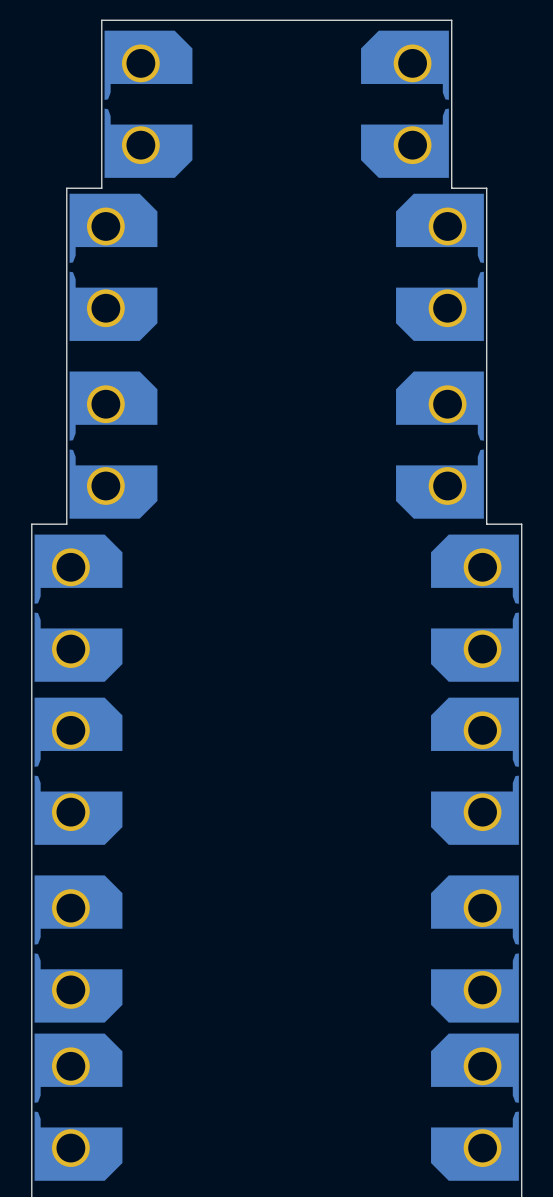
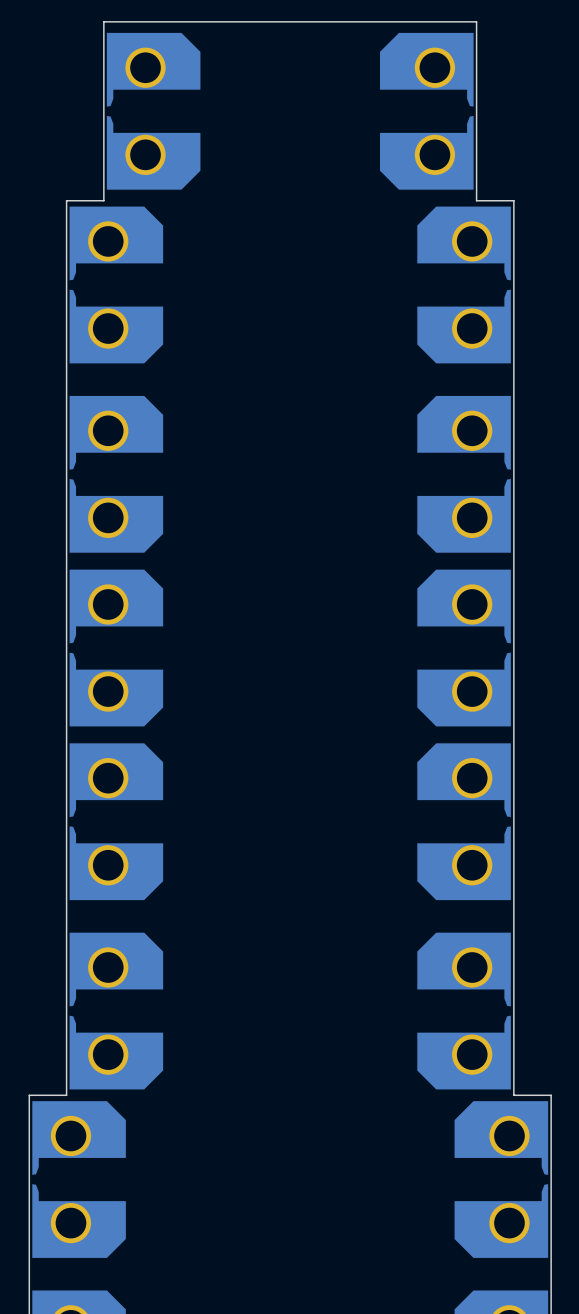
board edge: (66, 524) (31, 524) (31, 1028) -> (66, 558) (66, 1095) (29, 1095)
board edge: (486, 524) (521, 524) (521, 1028) -> (513, 558) (513, 1095) (551, 1095)
part position: (78, 608) -> (116, 648)
part position: (474, 608) -> (464, 648)
part position: (78, 771) -> (116, 821)
part position: (474, 771) -> (464, 821)
part position: (78, 949) -> (116, 1011)
part position: (474, 949) -> (464, 1011)

